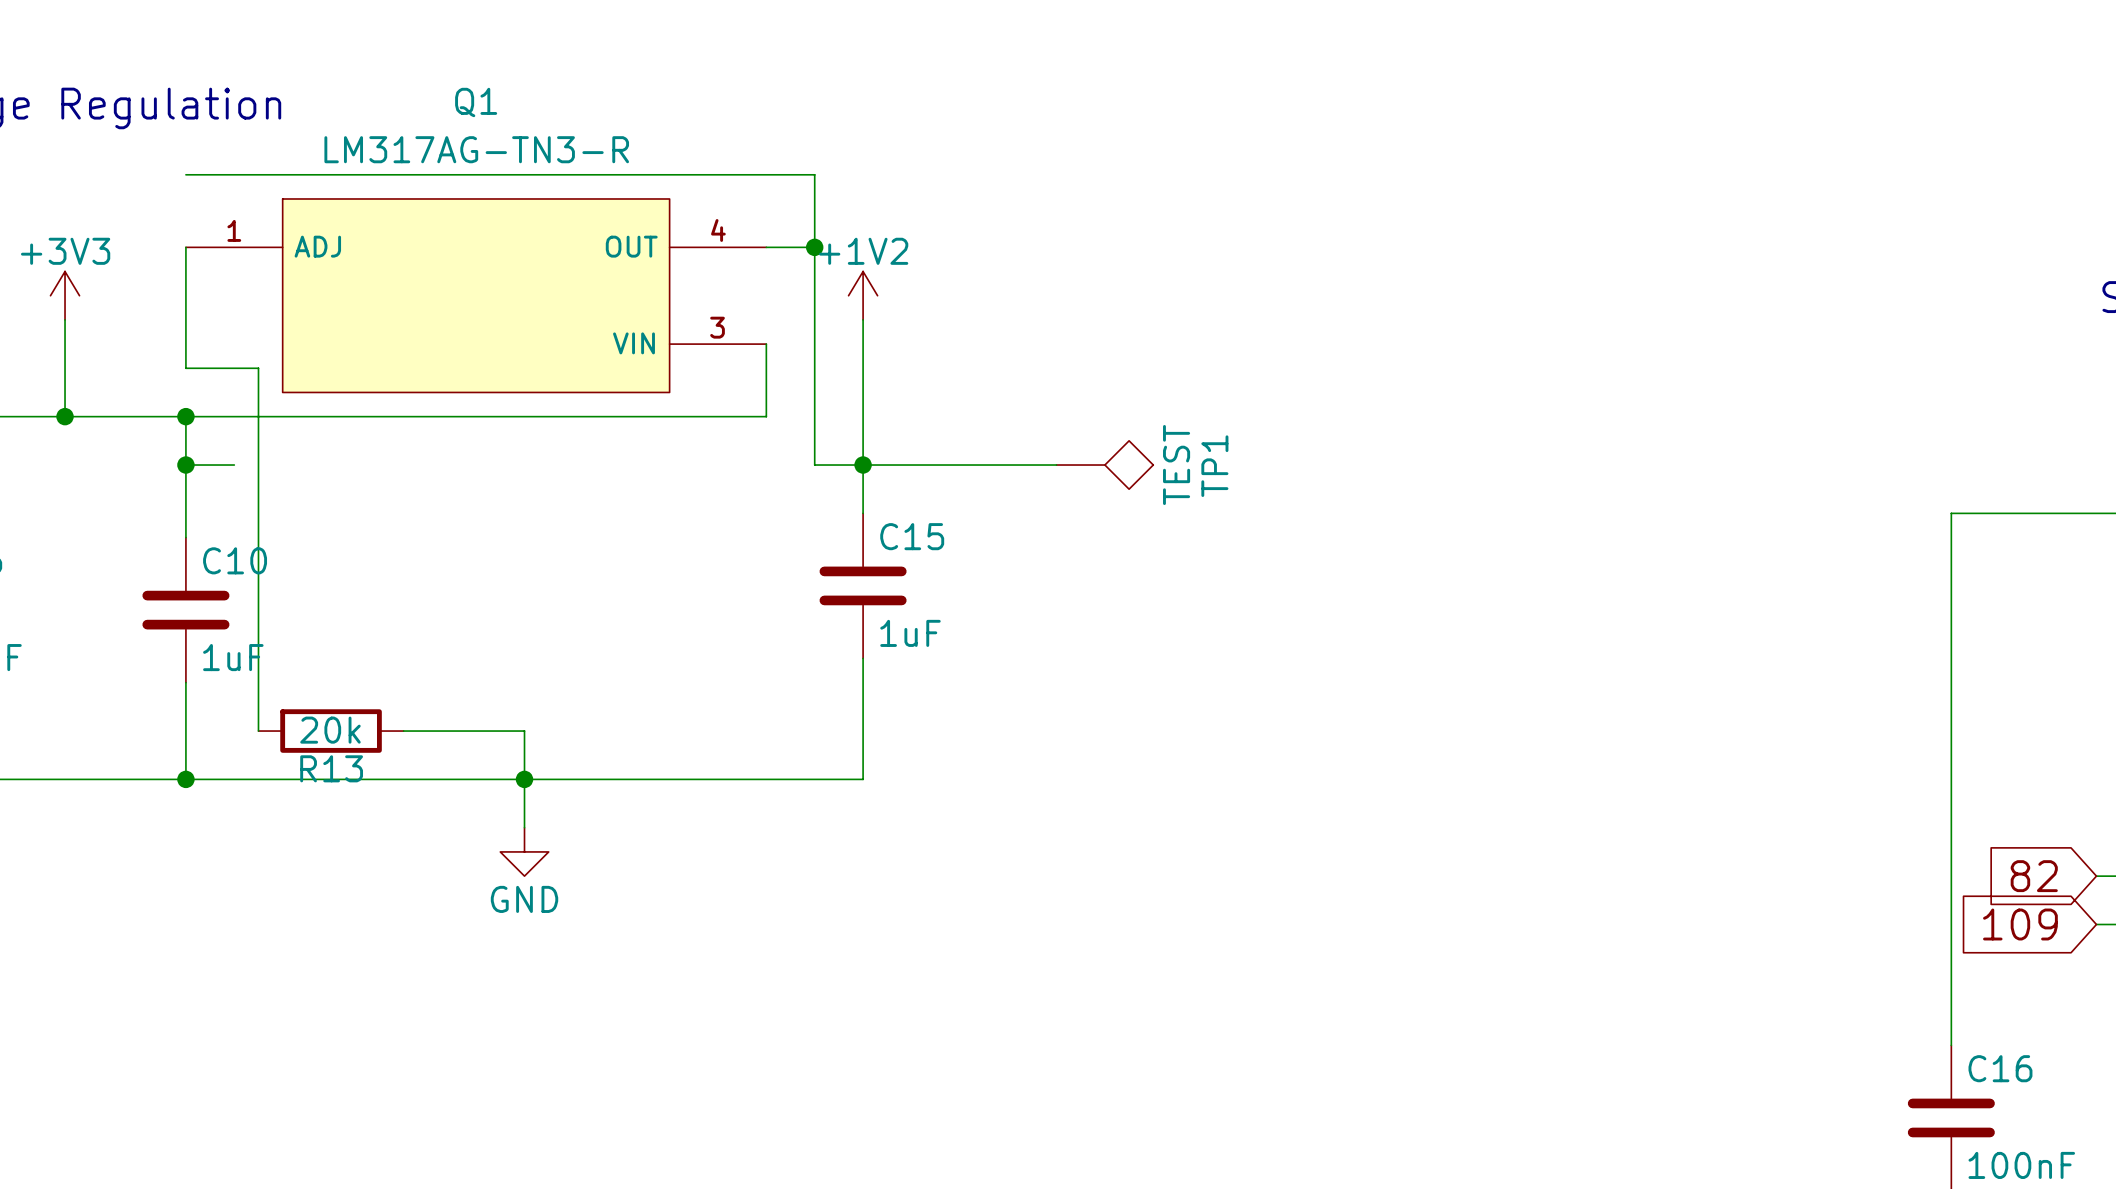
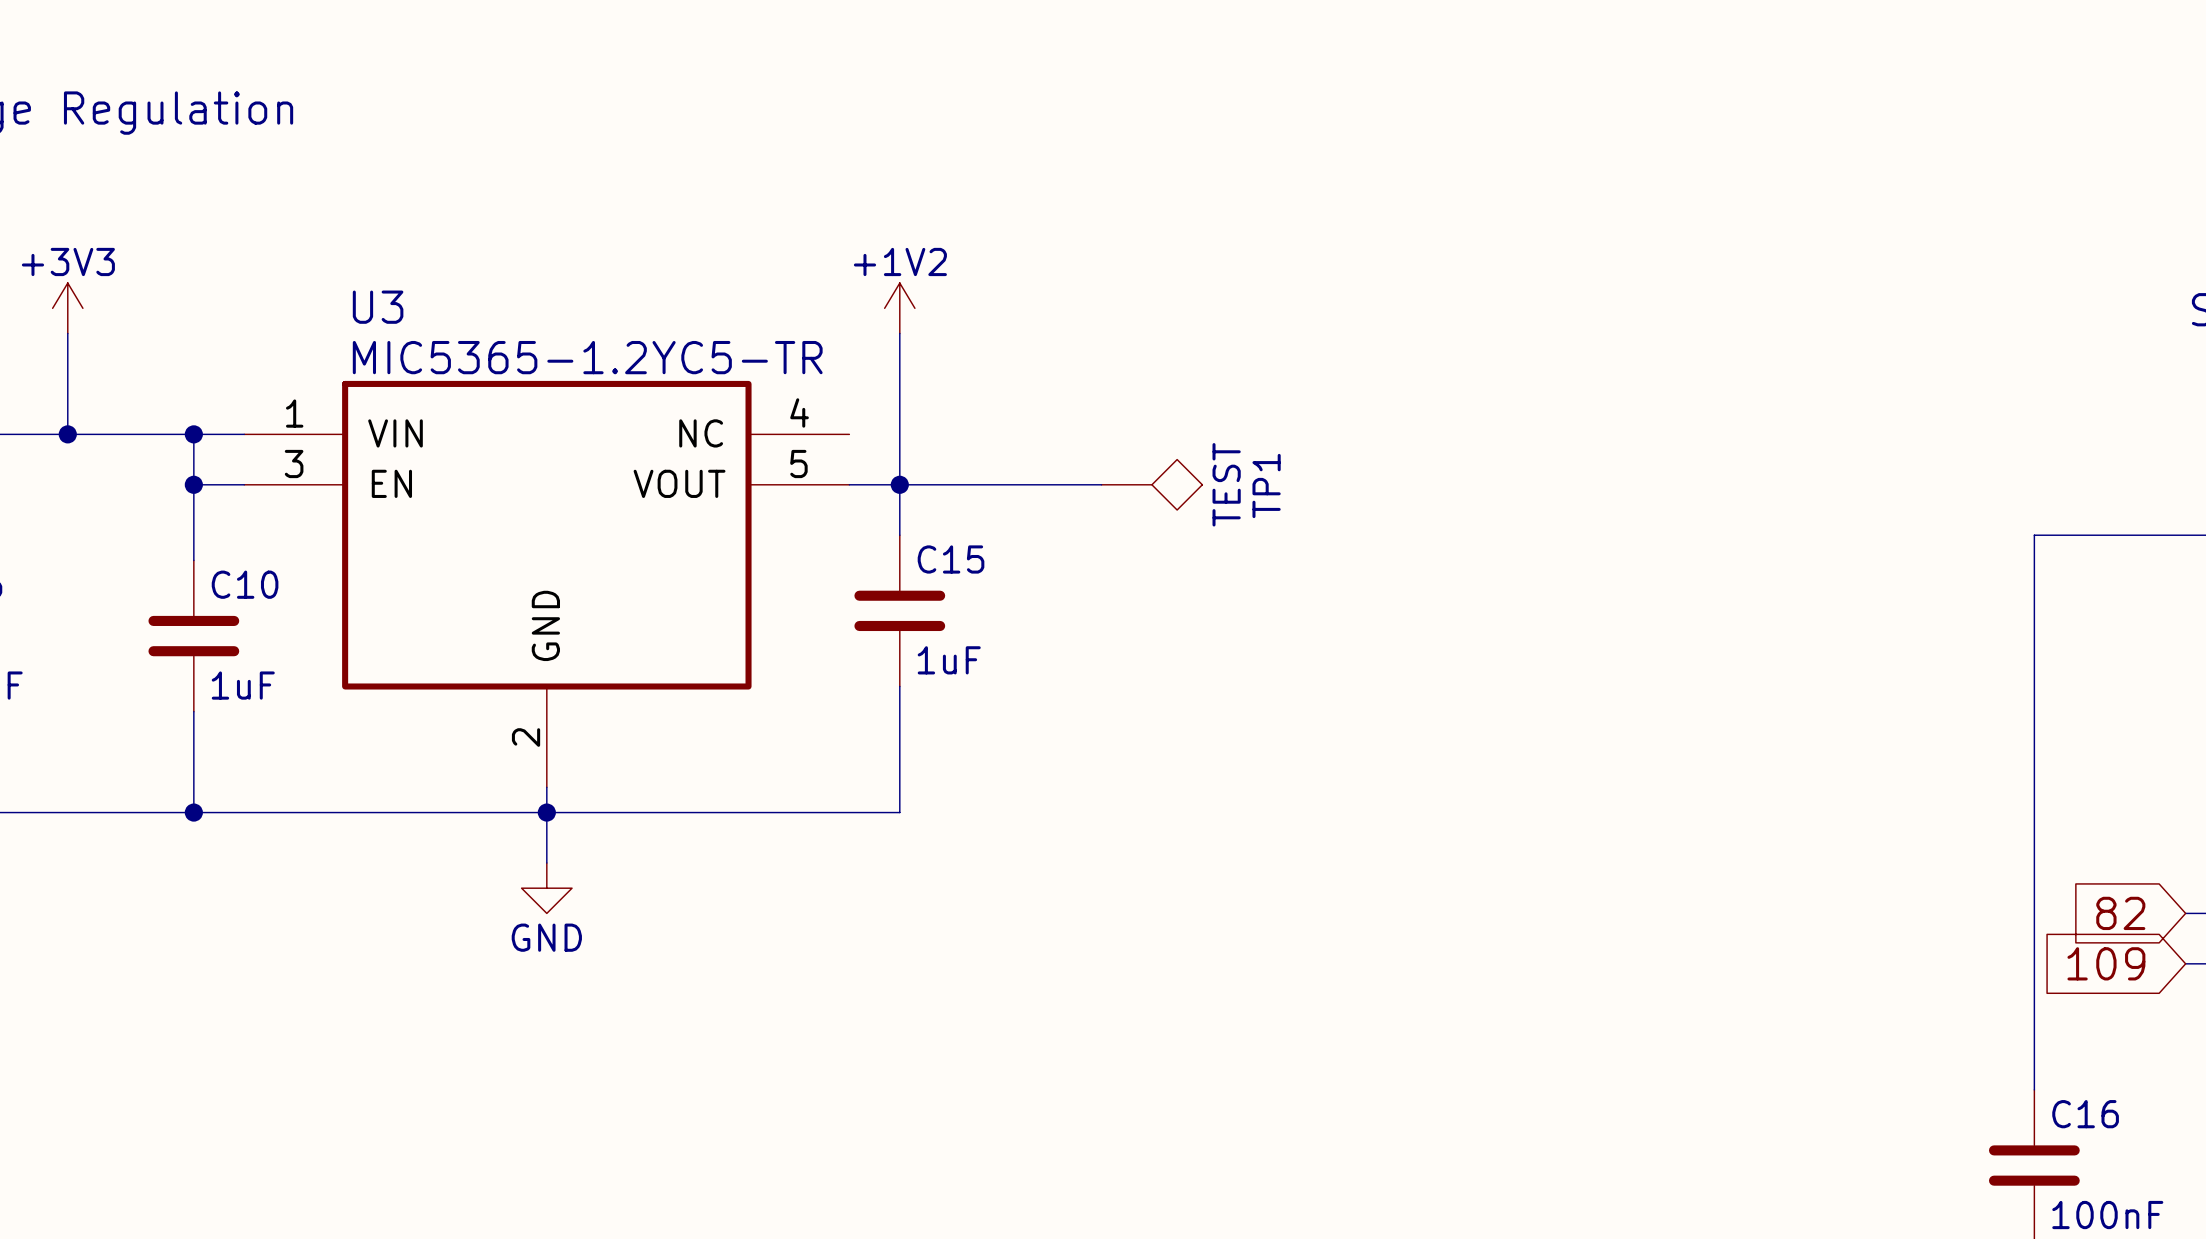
wire: (185, 174) (814, 174) (814, 465) -> none
wire: (185, 247) (185, 368) (258, 368) (258, 731) -> none
wire: (766, 247) (814, 247) -> none
junction: (814, 247) -> none
Q1: LM317AG-TN3-R (476, 295) -> none
wire: (766, 344) (766, 416) (234, 416) -> none
U3: none -> MIC5365-1.2YC5-TR (546, 584)
R13: 20k (331, 731) -> none
wire: (403, 731) (524, 731) (524, 755) -> none

